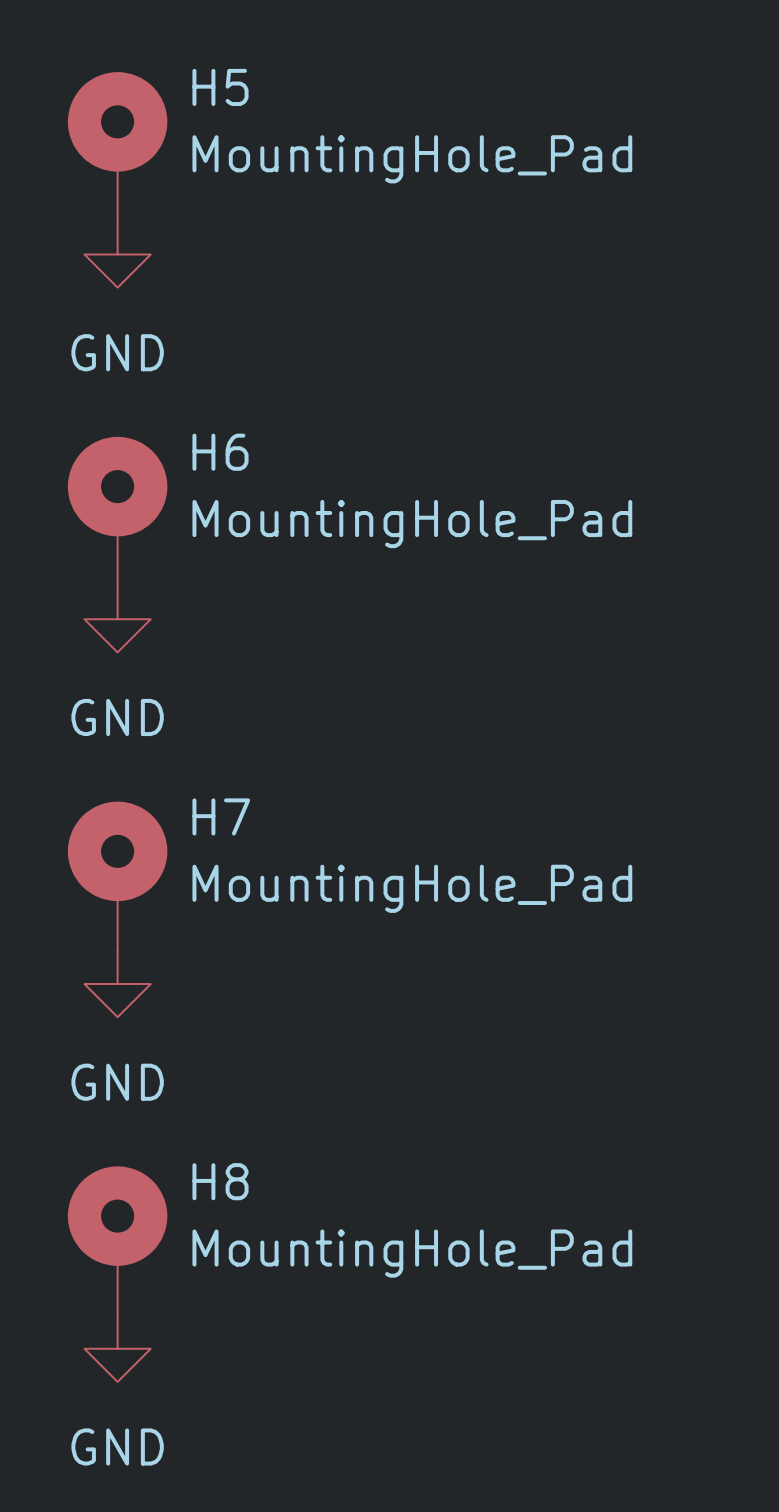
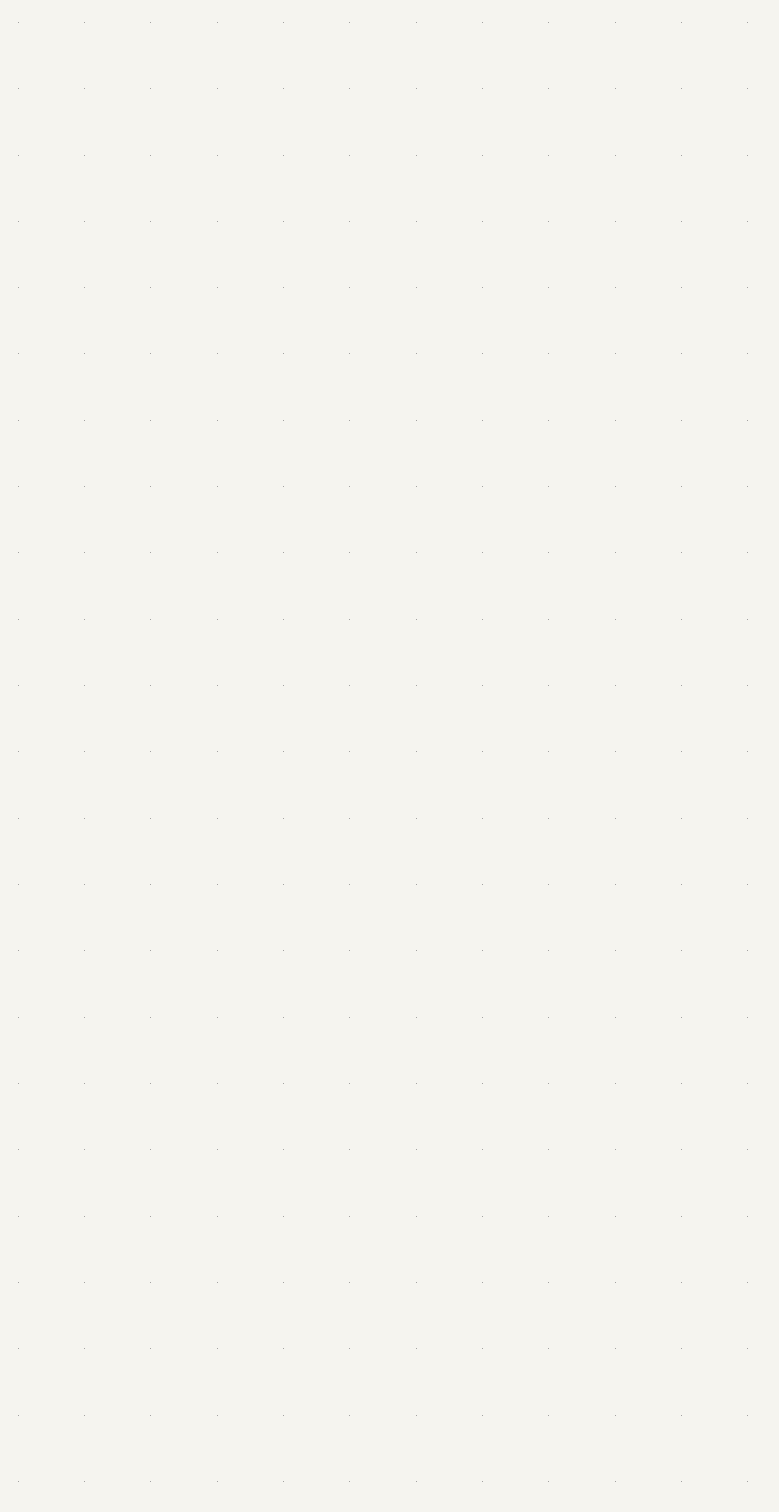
H5: MountingHole_Pad (117, 146) -> none
power symbol: GND (117, 254) -> none
H6: MountingHole_Pad (117, 511) -> none
power symbol: GND (117, 619) -> none
H7: MountingHole_Pad (117, 876) -> none
power symbol: GND (117, 983) -> none
H8: MountingHole_Pad (117, 1240) -> none
power symbol: GND (117, 1348) -> none

